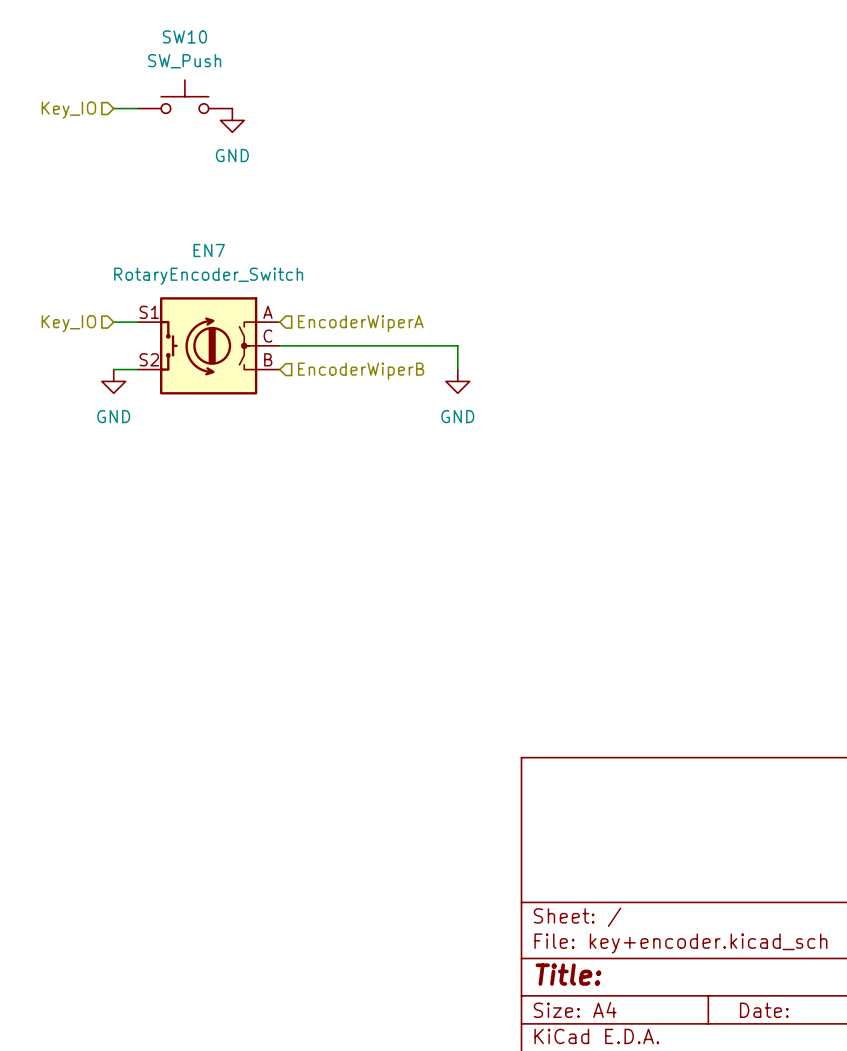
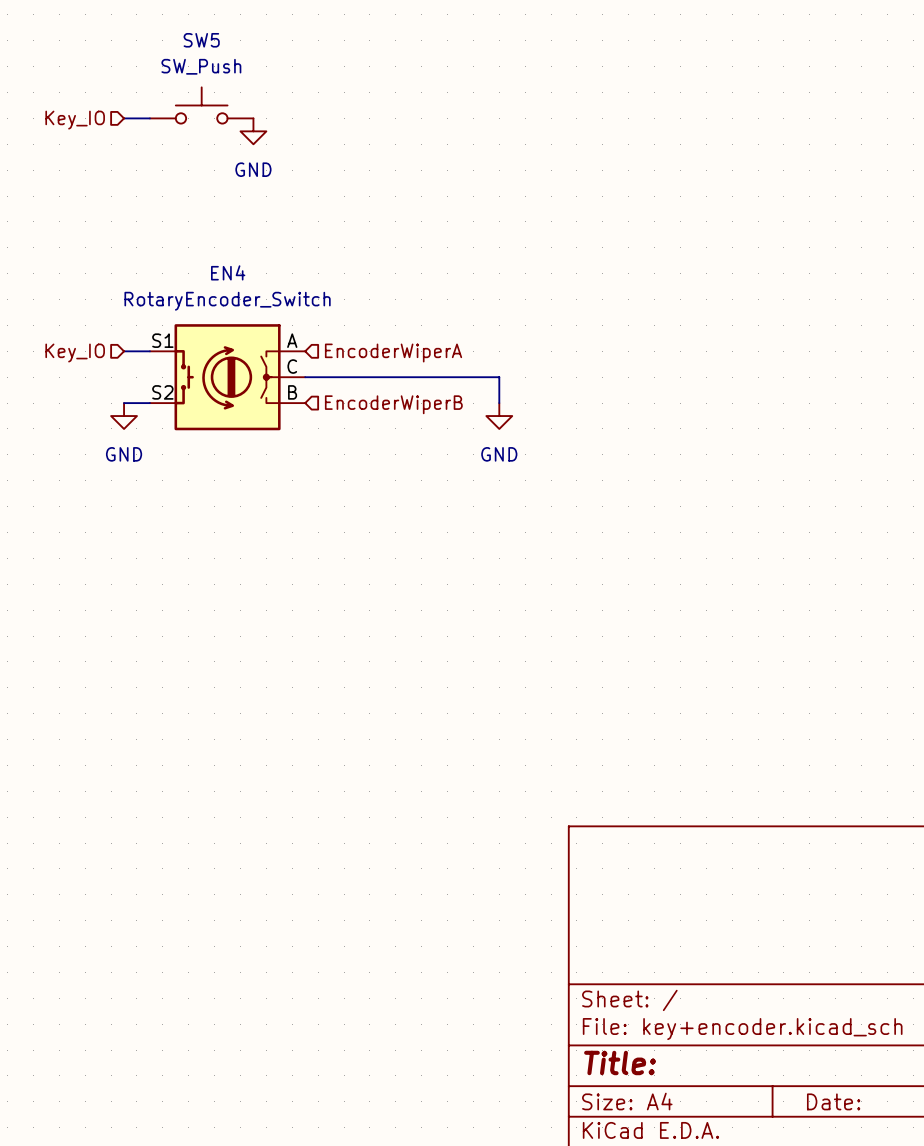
SW10 name: SW10 (184, 36) -> SW5 (201, 40)
EN7 name: EN7 (209, 250) -> EN4 (228, 272)

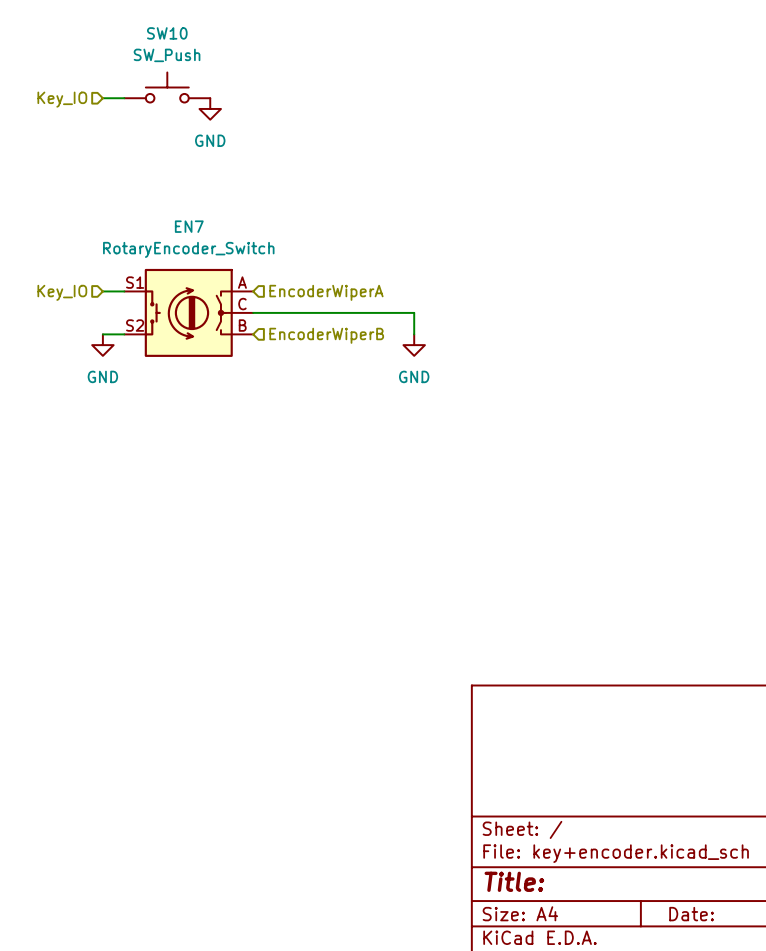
SW5 name: SW5 (201, 40) -> SW10 (167, 33)
EN4 name: EN4 (228, 272) -> EN7 (189, 226)

